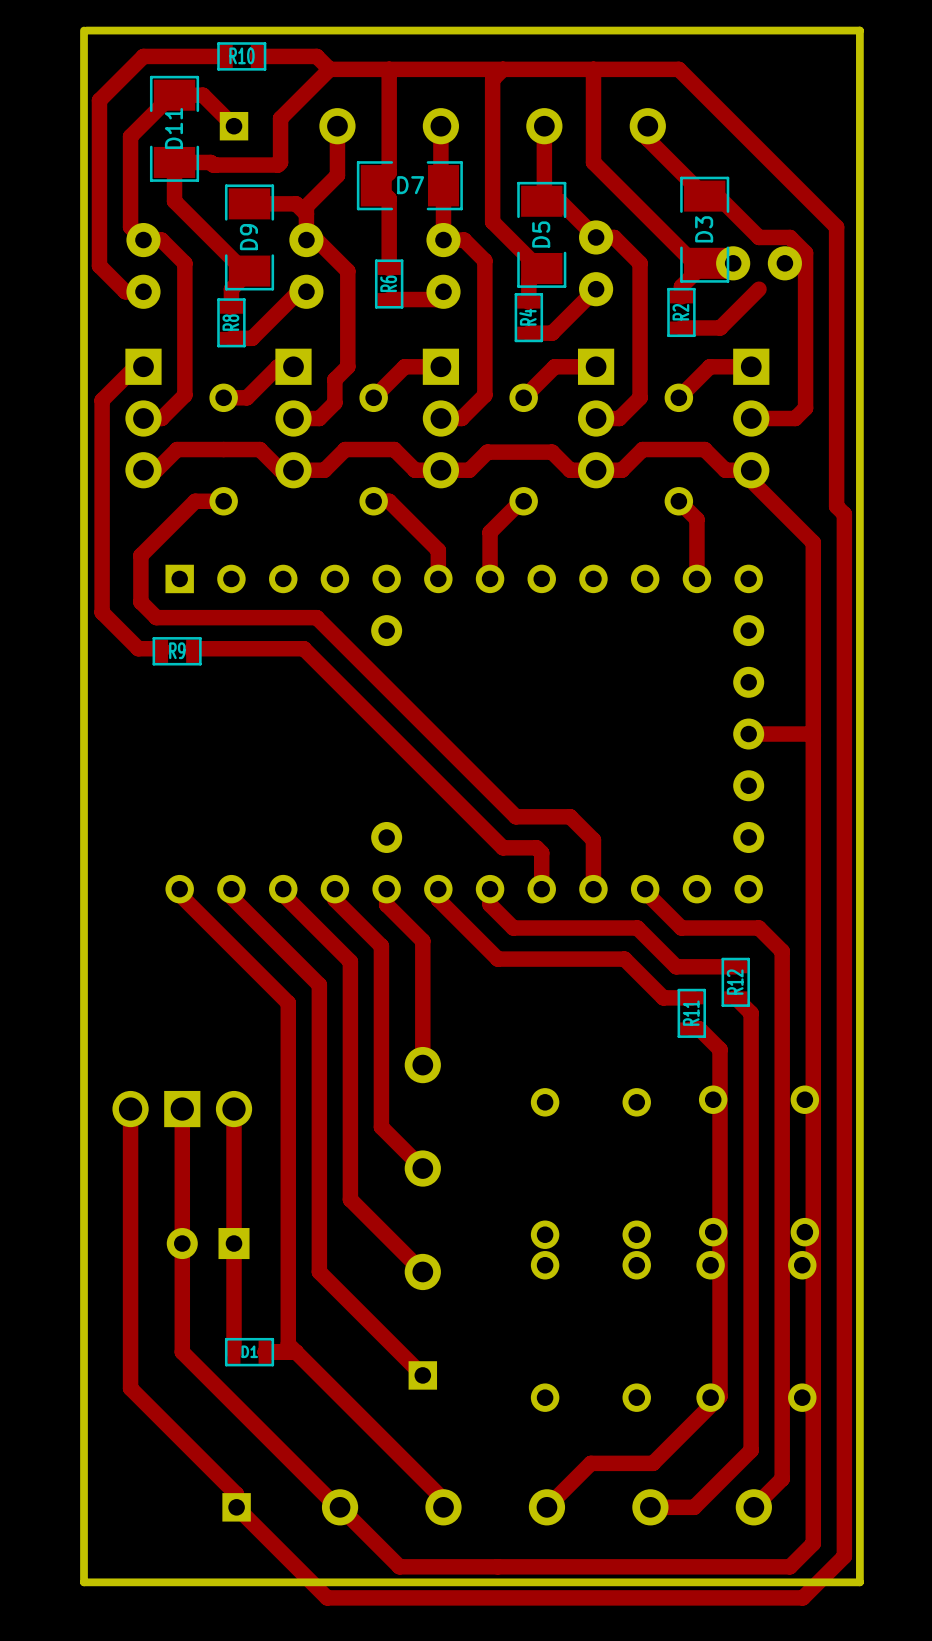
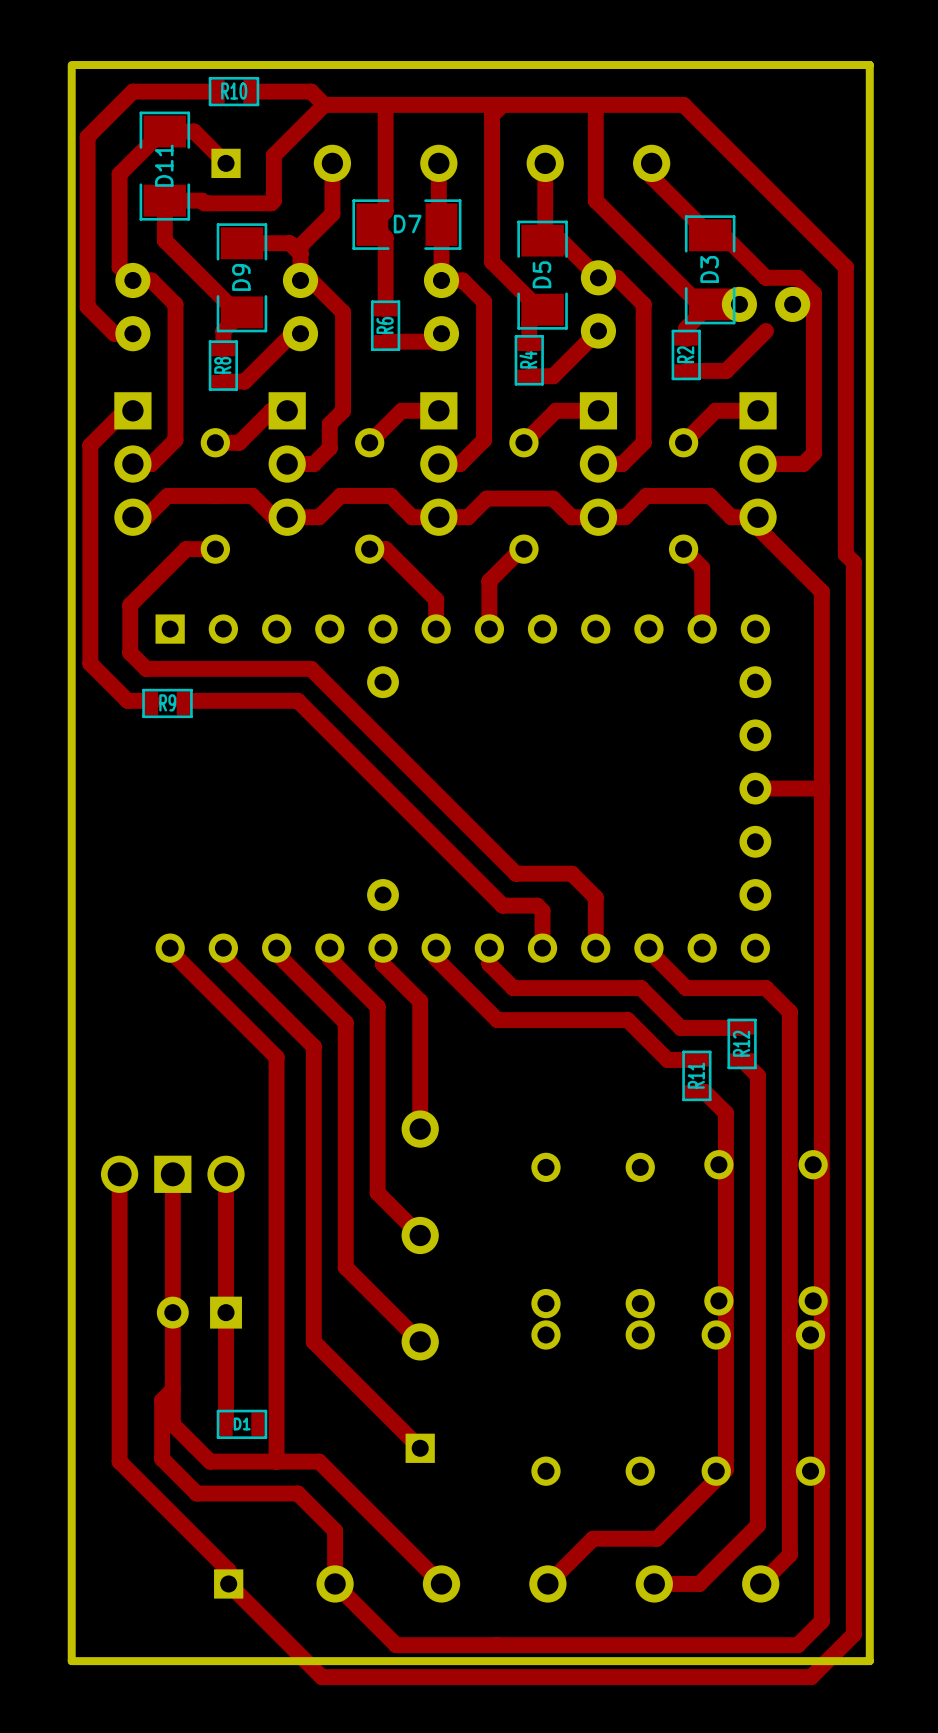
track: (179, 891) (179, 894) (288, 1003) (288, 1344) (443, 1499) (443, 1507) -> (170, 950) (276, 1057) (276, 1461)
track: (218, 1388) (337, 1507) (340, 1507) -> (172, 1389) (162, 1400) (162, 1458) (196, 1493) (297, 1493) (335, 1530) (335, 1583)
track: none -> (210, 1461) (319, 1461) (441, 1583)

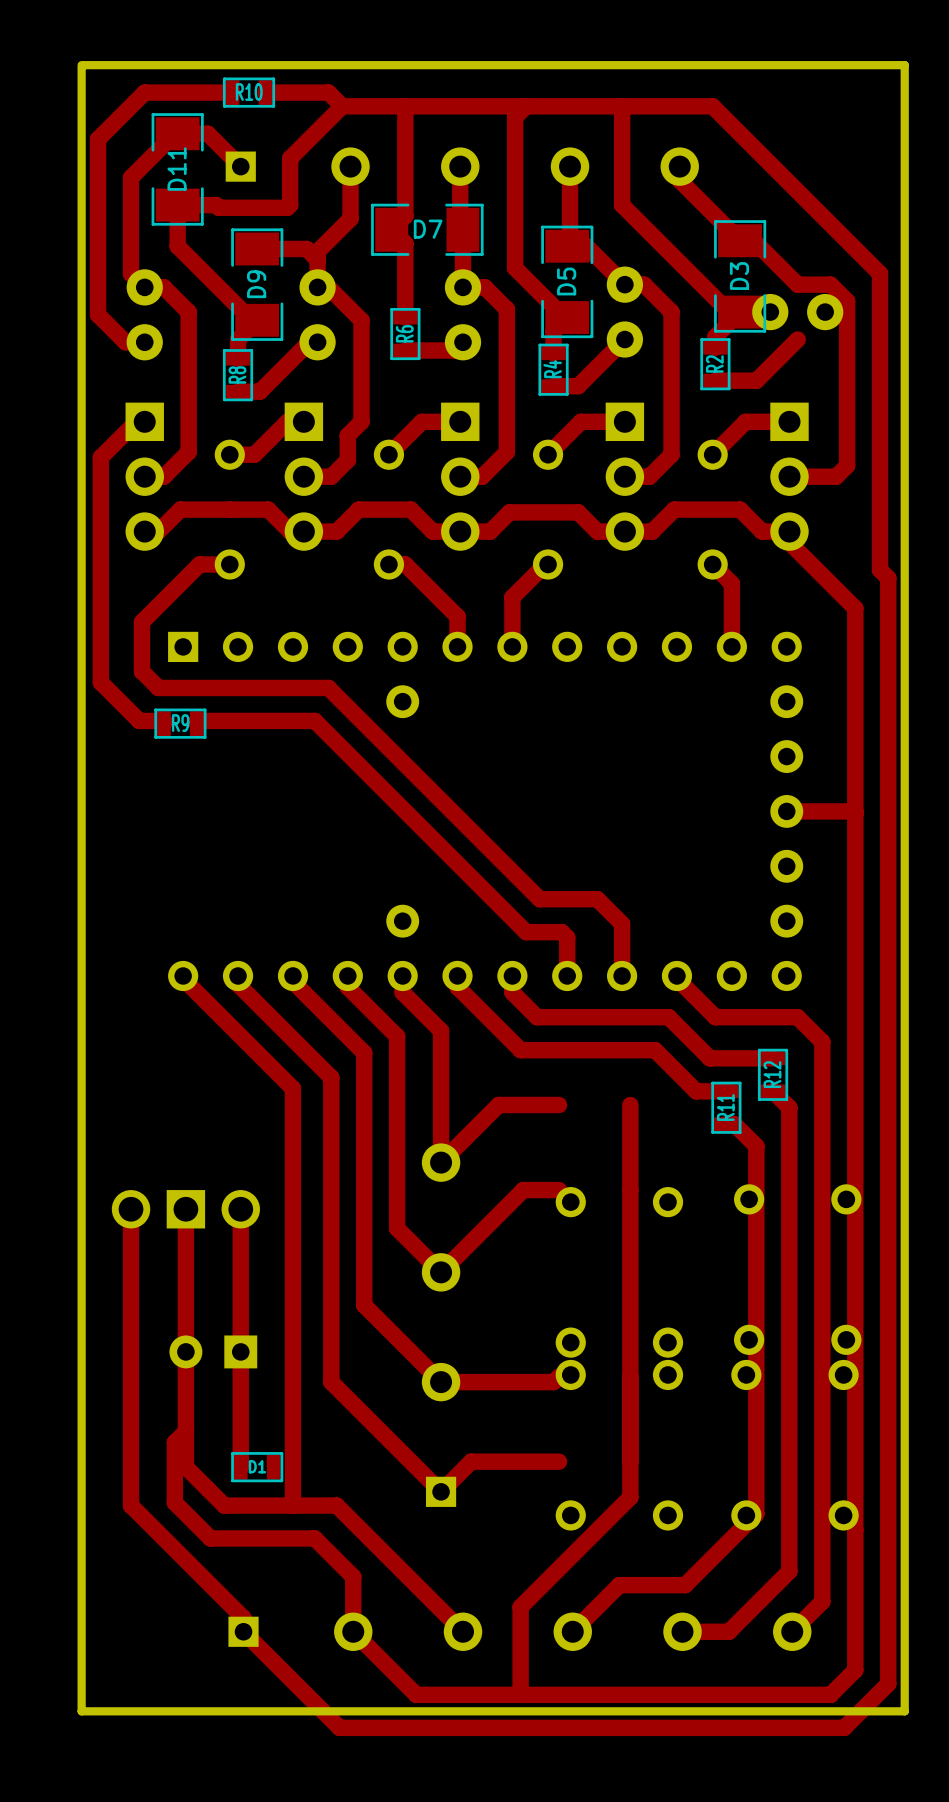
track: none -> (559, 1104) (498, 1104) (441, 1162)
track: none -> (630, 1104) (630, 1497) (520, 1607) (520, 1694)
track: none -> (559, 1190) (523, 1190) (441, 1272)
track: none -> (559, 1376) (553, 1382) (441, 1382)
track: none -> (559, 1461) (471, 1461) (441, 1491)

